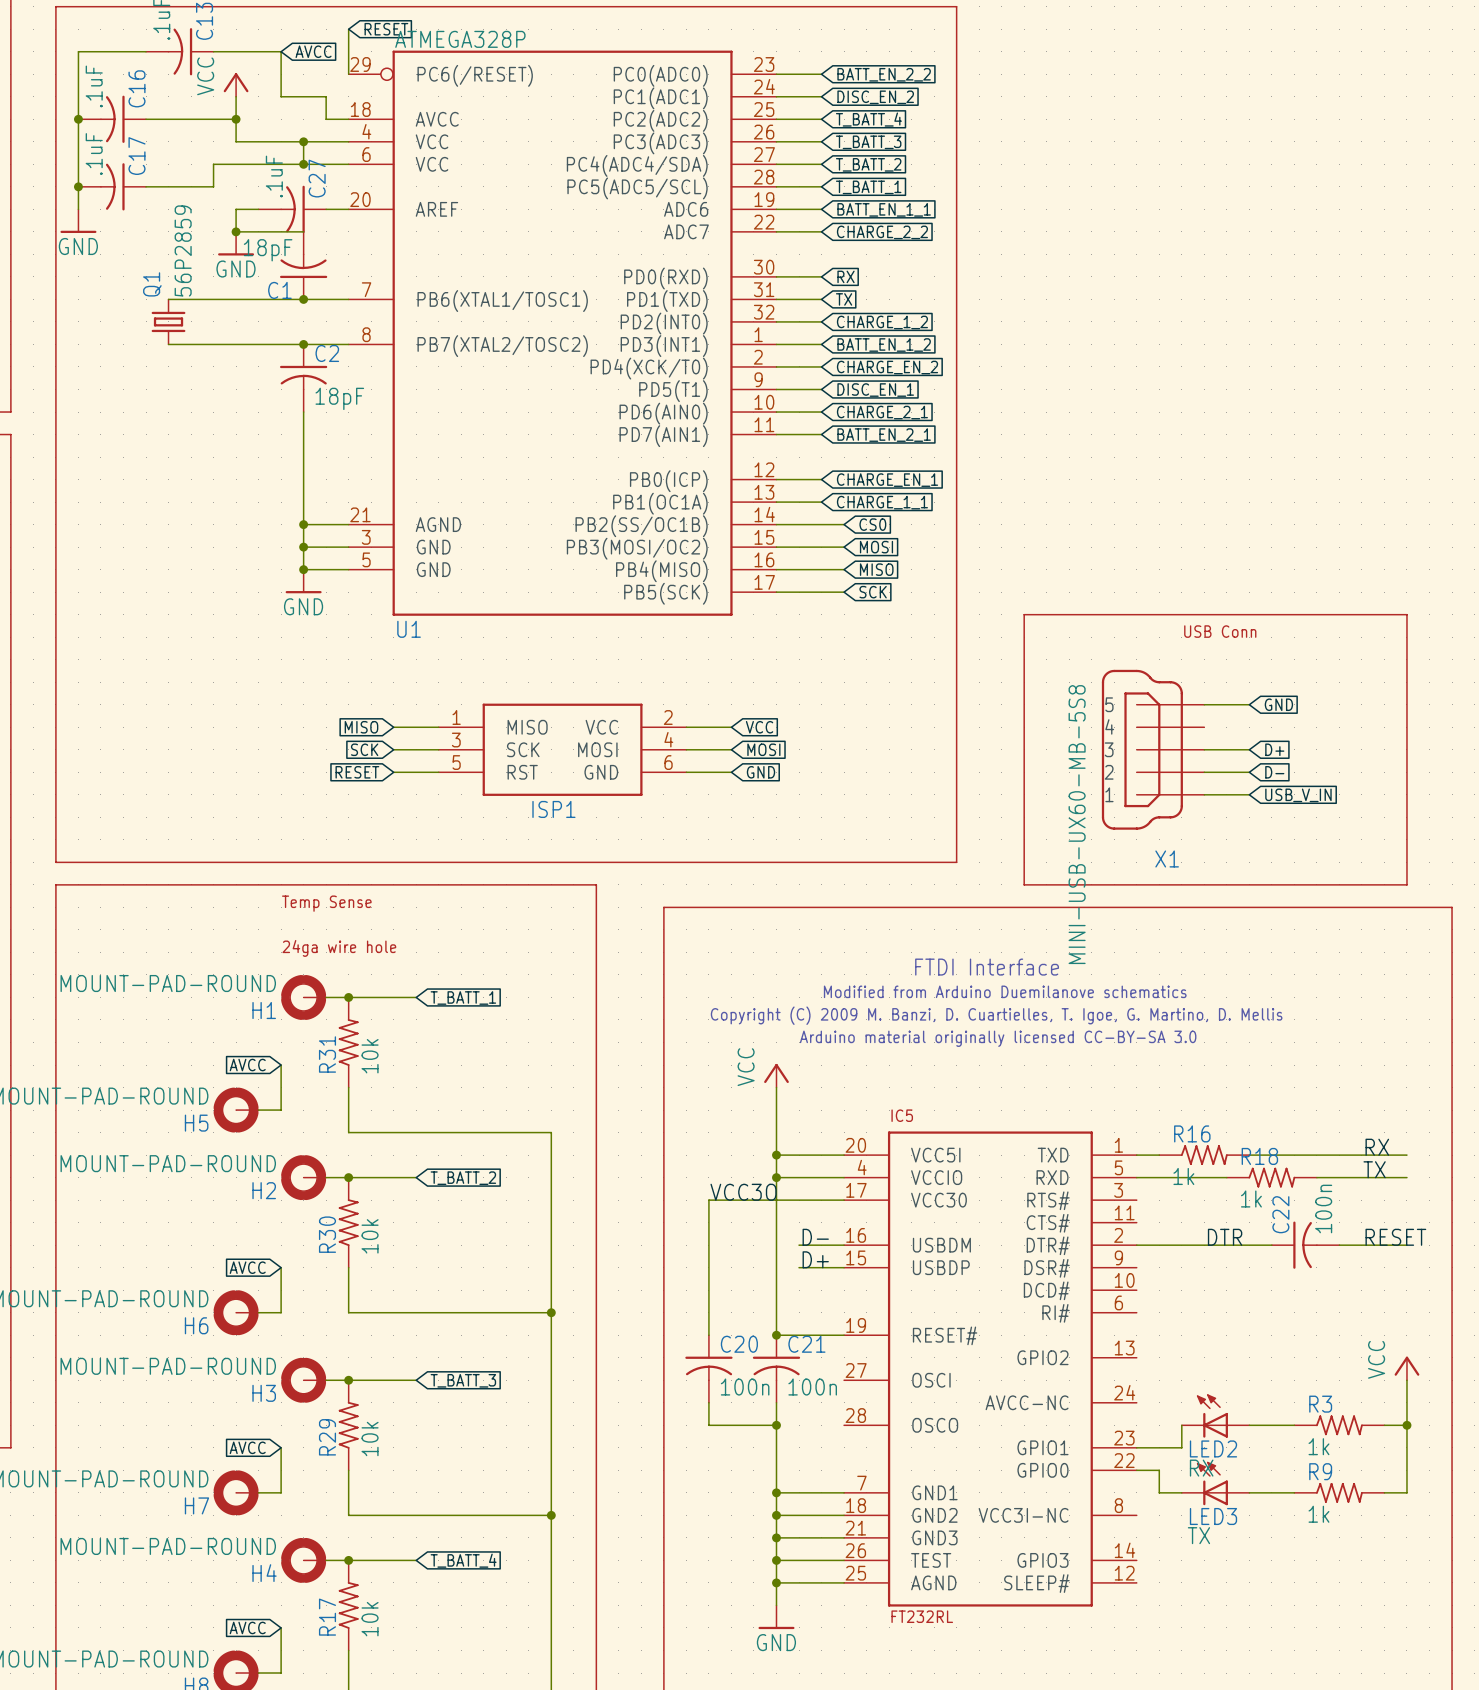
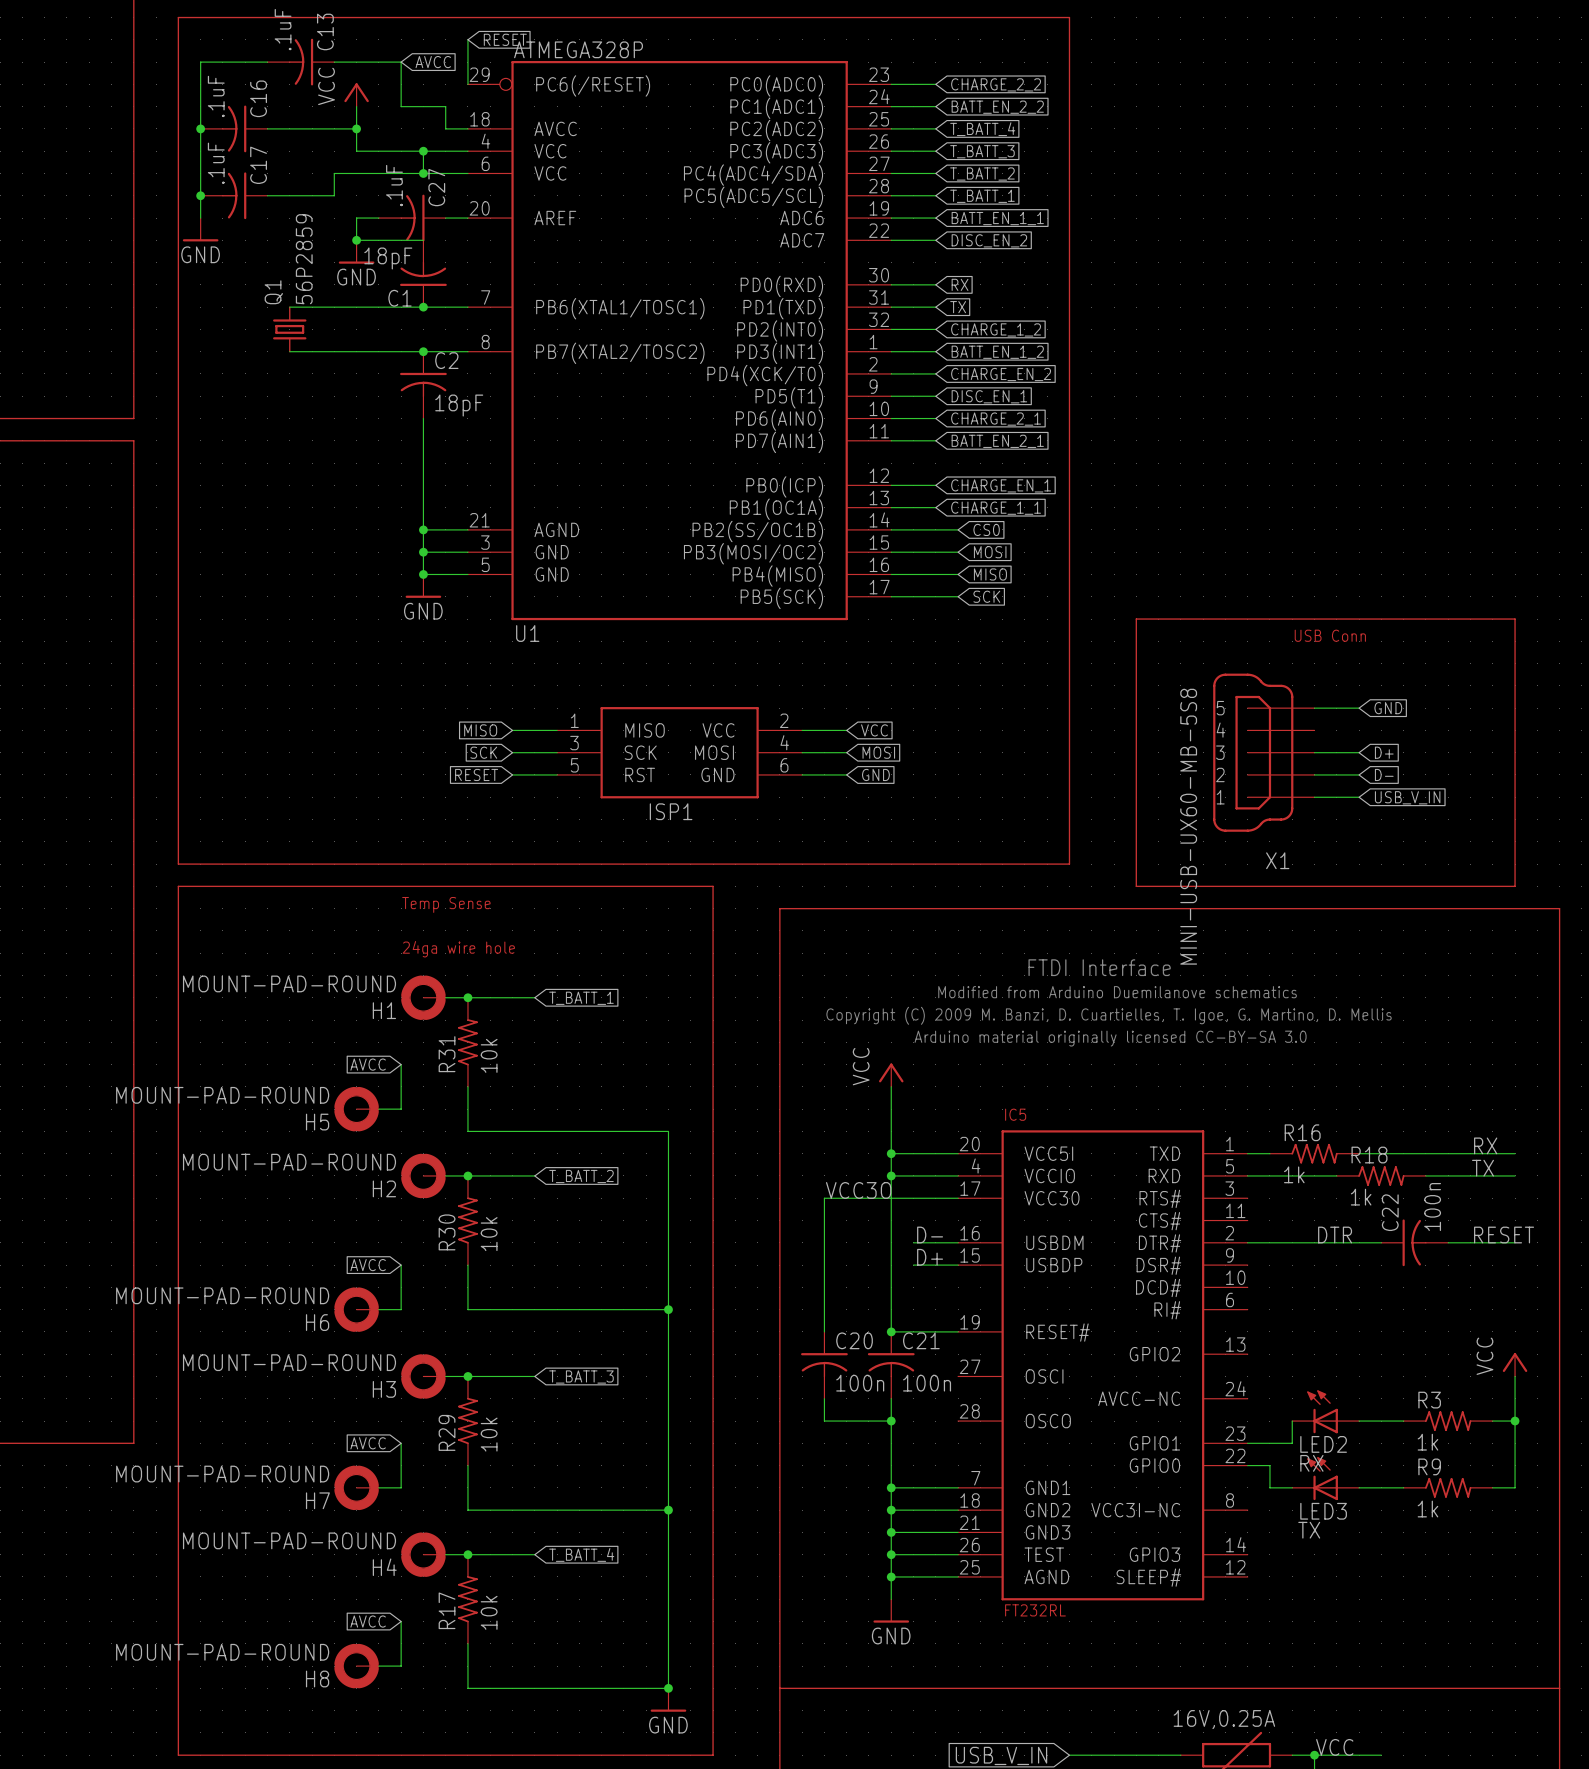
global label: BATT_EN_2_2 (884, 74) -> CHARGE_2_2 (996, 84)
global label: DISC_EN_2 (875, 97) -> BATT_EN_2_2 (997, 107)
global label: CHARGE_2_2 (882, 232) -> DISC_EN_2 (989, 240)

